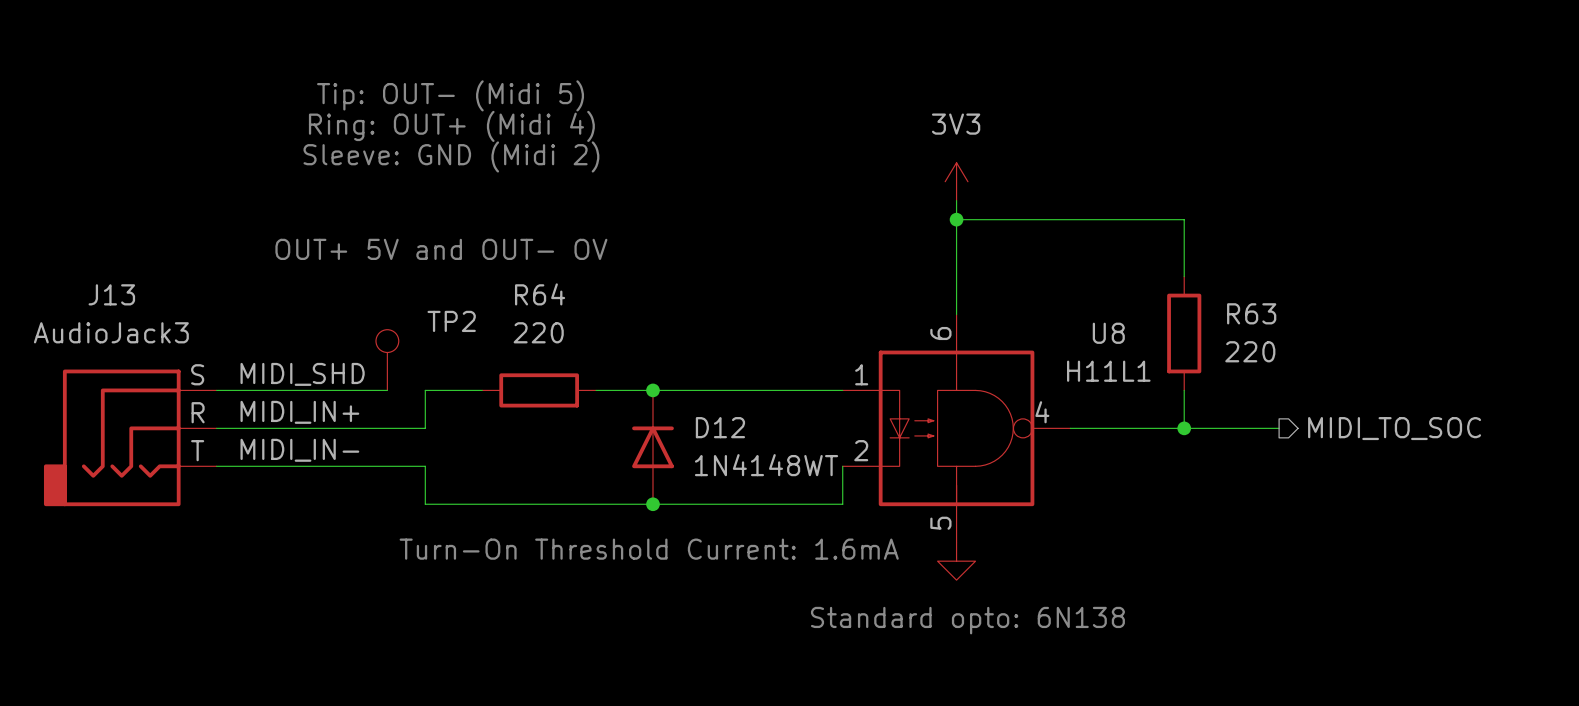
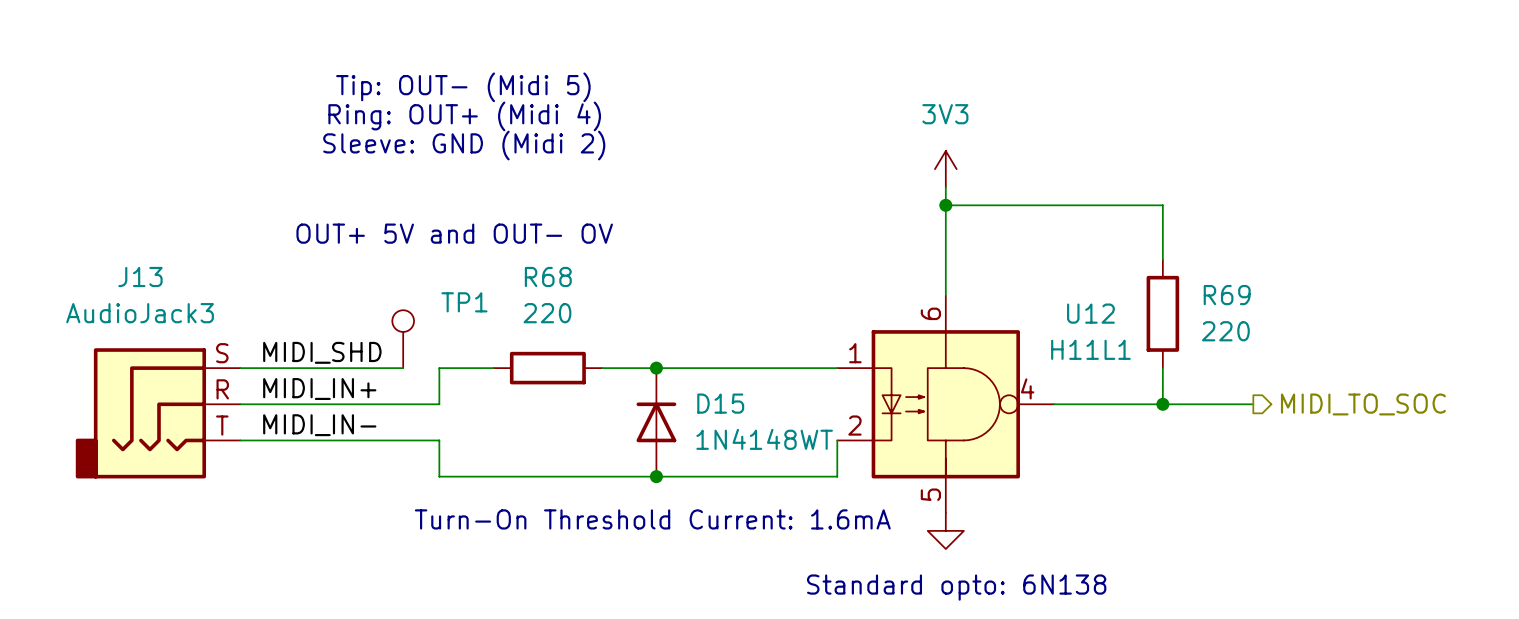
R64 name: R64 (540, 294) -> R68 (548, 277)
R63 name: R63 (1251, 313) -> R69 (1227, 295)
TP2 name: TP2 (451, 321) -> TP1 (464, 302)
U8 name: U8 (1108, 333) -> U12 (1090, 313)
D12 name: D12 (720, 427) -> D15 (720, 403)

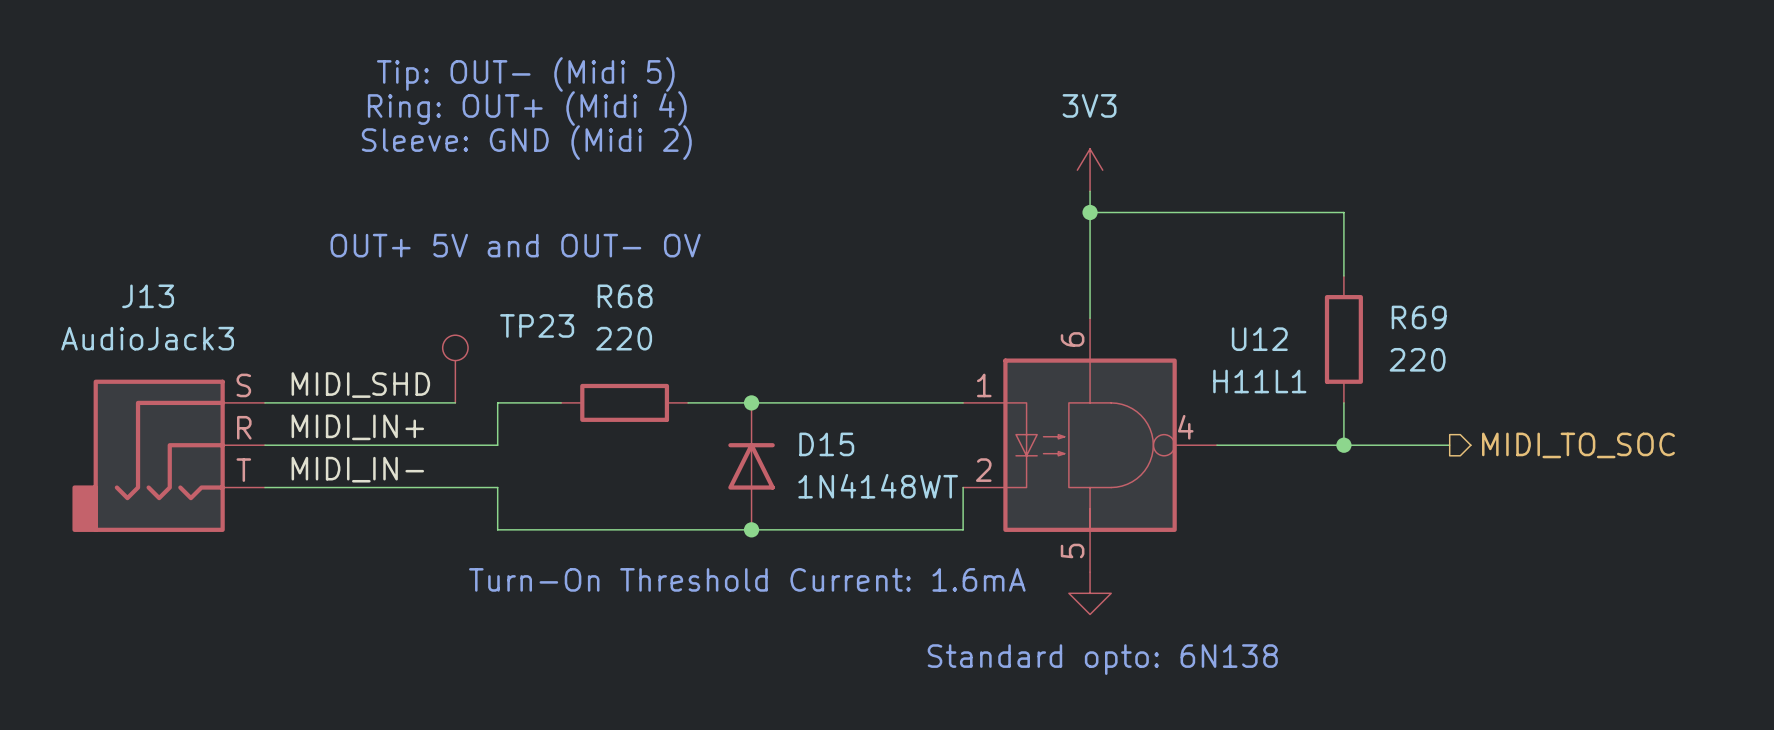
TP1 name: TP1 (464, 302) -> TP23 (537, 325)

